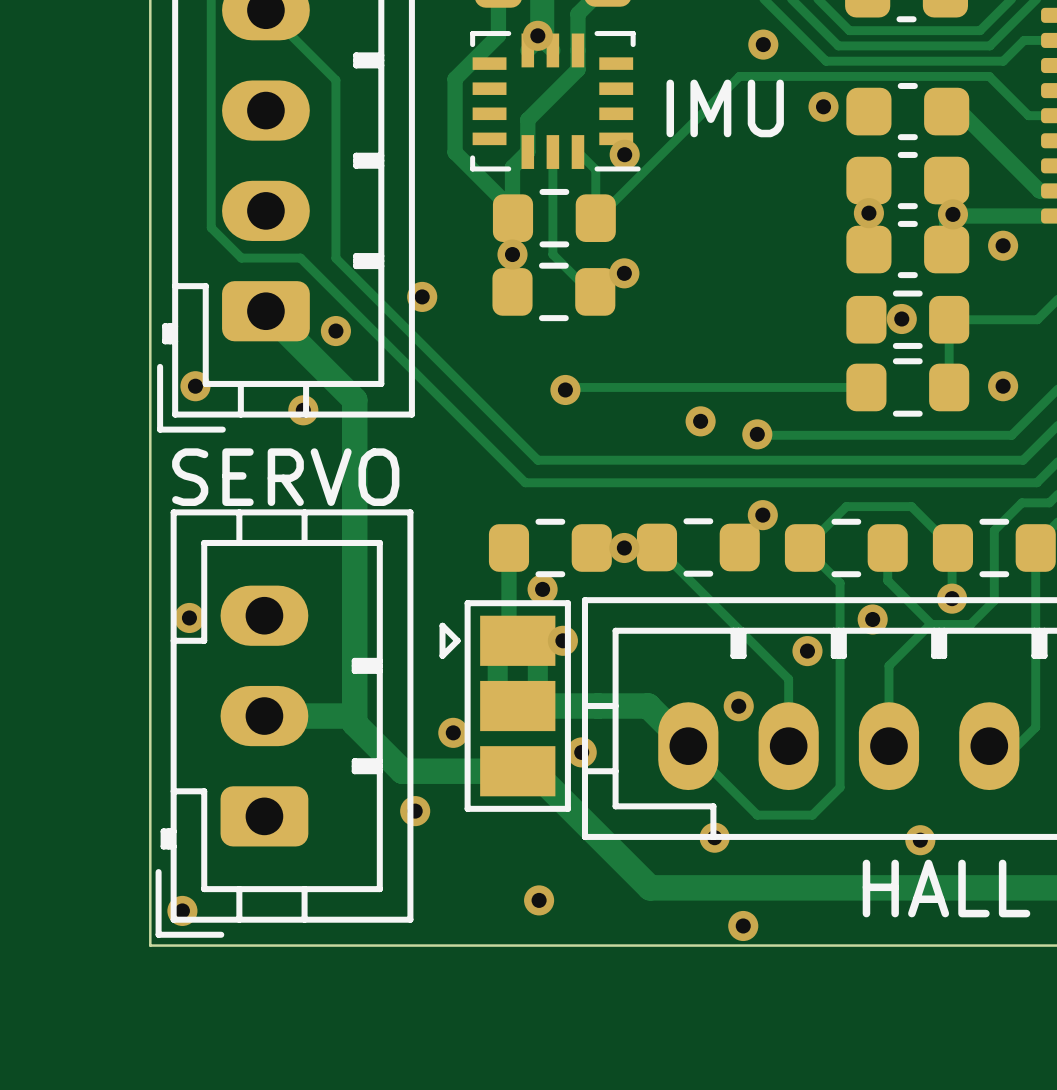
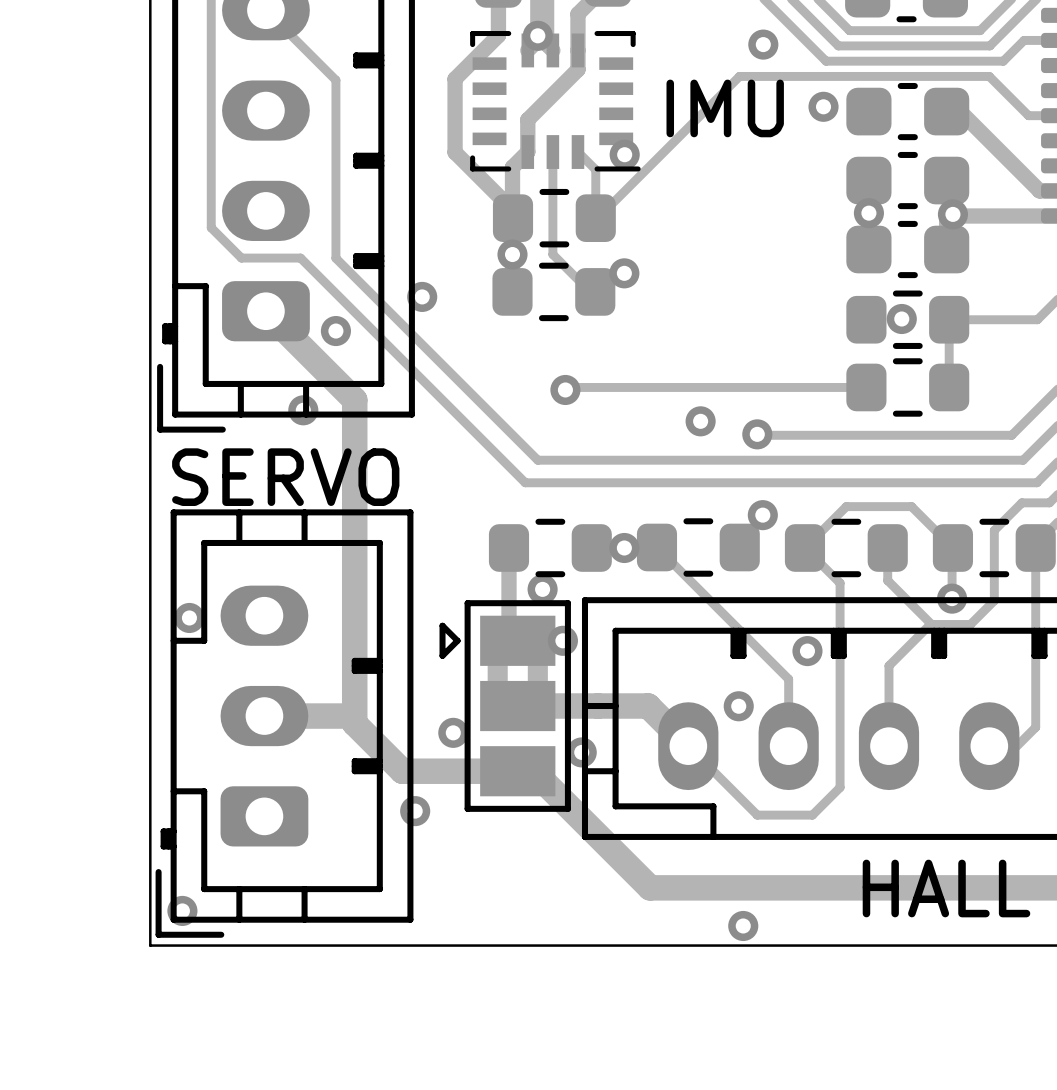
via: (1003, 245) -> none
via: (195, 386) -> none
via: (1003, 386) -> none
via: (872, 619) -> none
via: (714, 837) -> none
via: (920, 840) -> none
via: (539, 900) -> none

